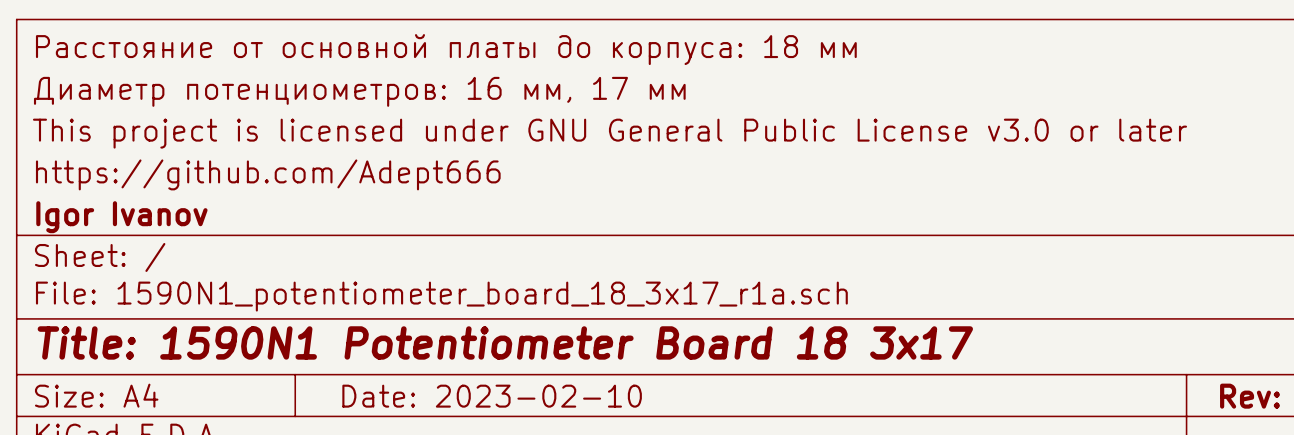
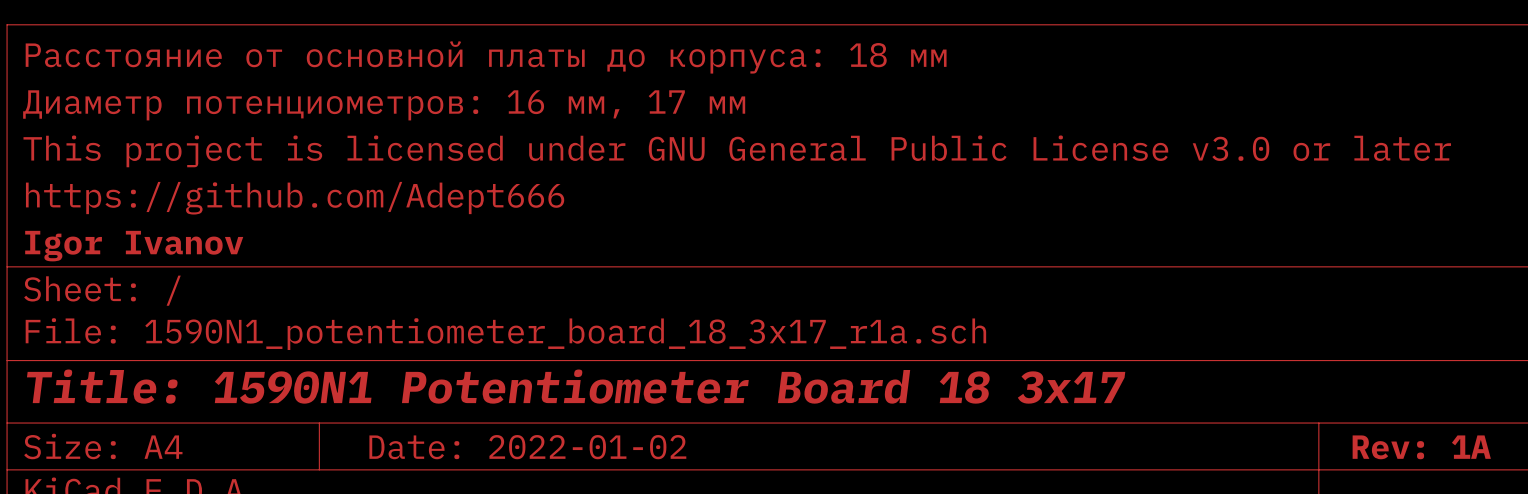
title block: Date: 2023-02-10 (492, 396) -> Date: 2022-01-02 (527, 447)

